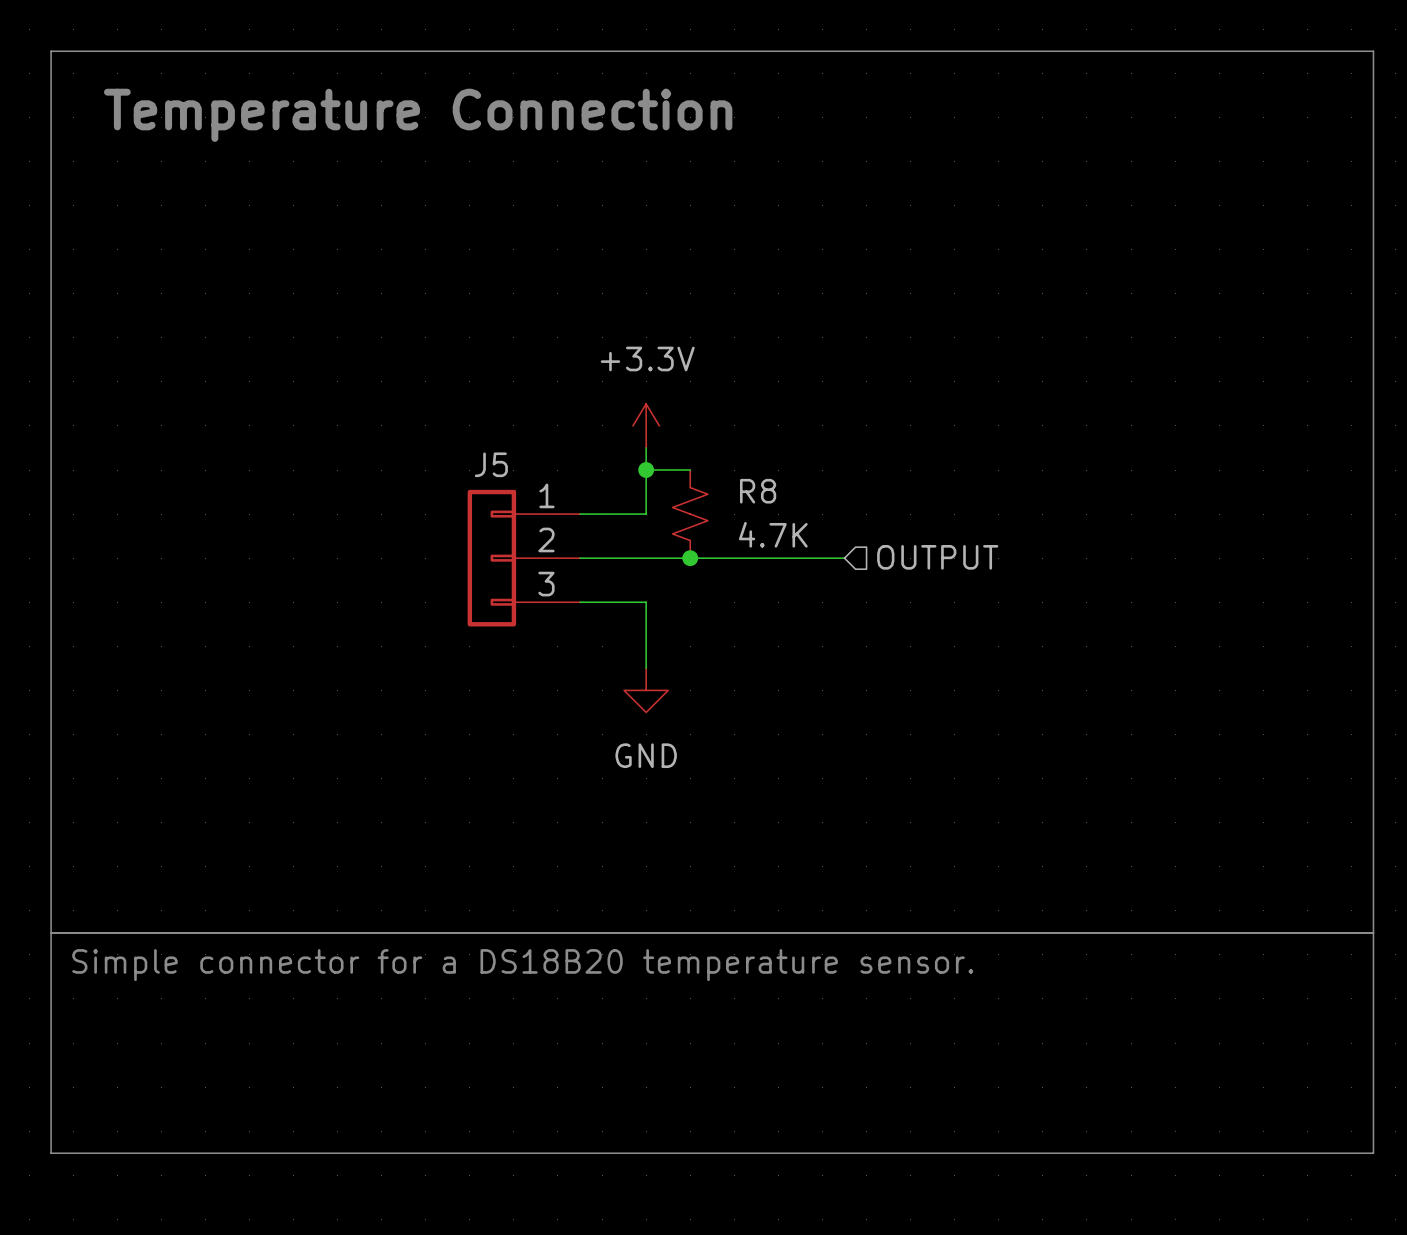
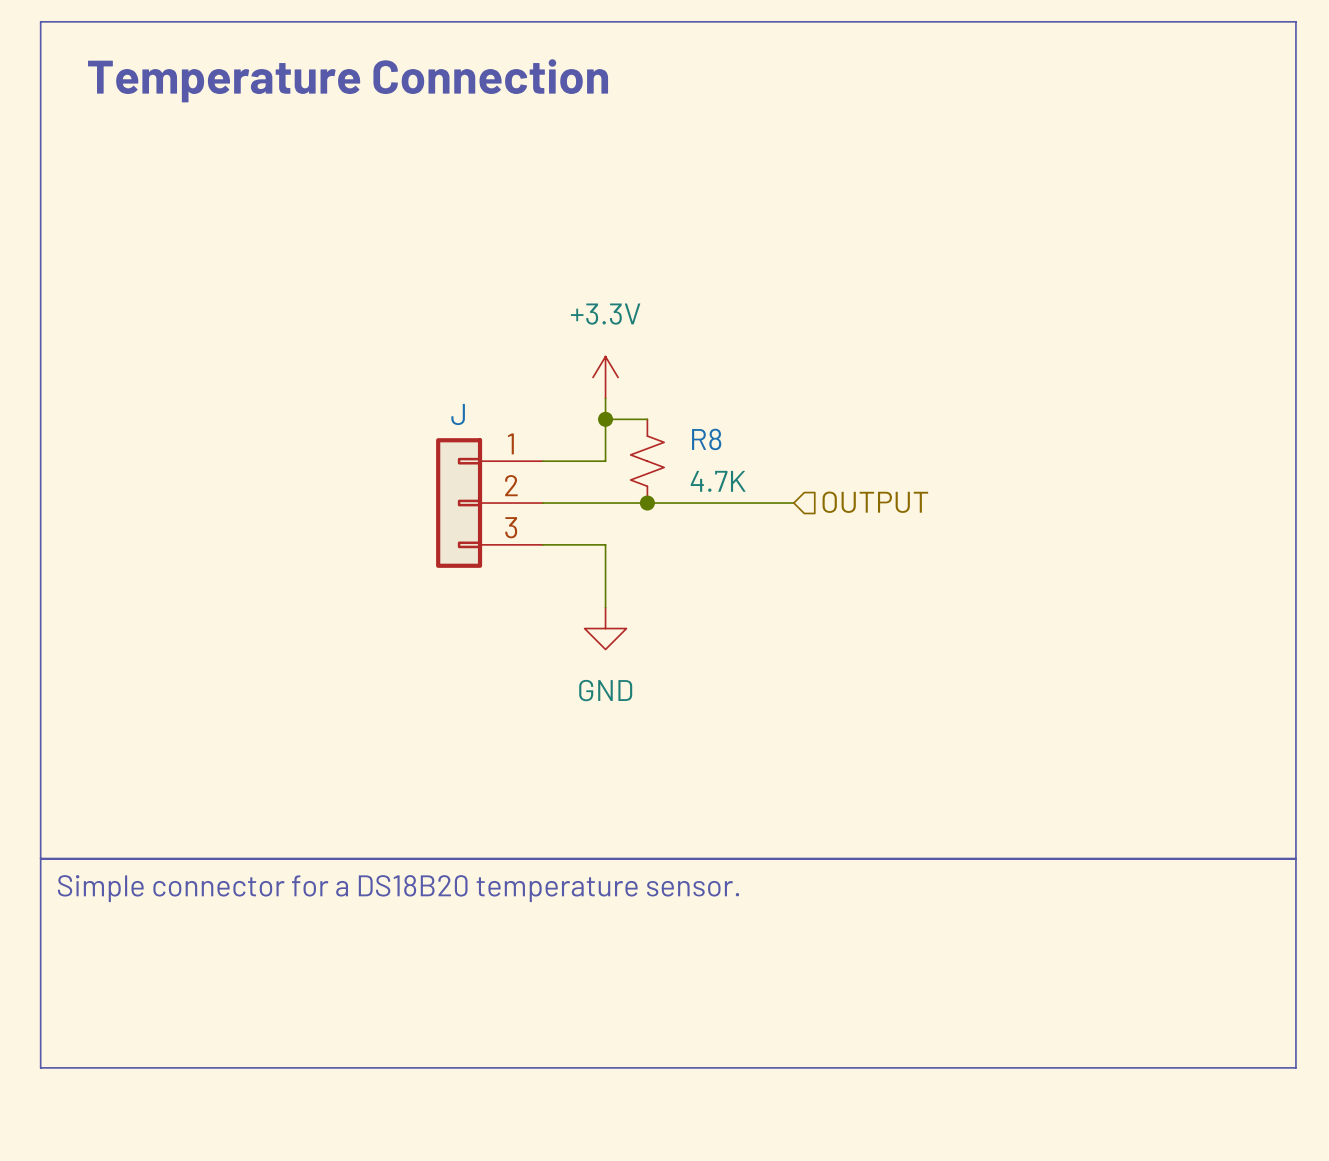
J5 name: J5 (491, 464) -> J (458, 414)

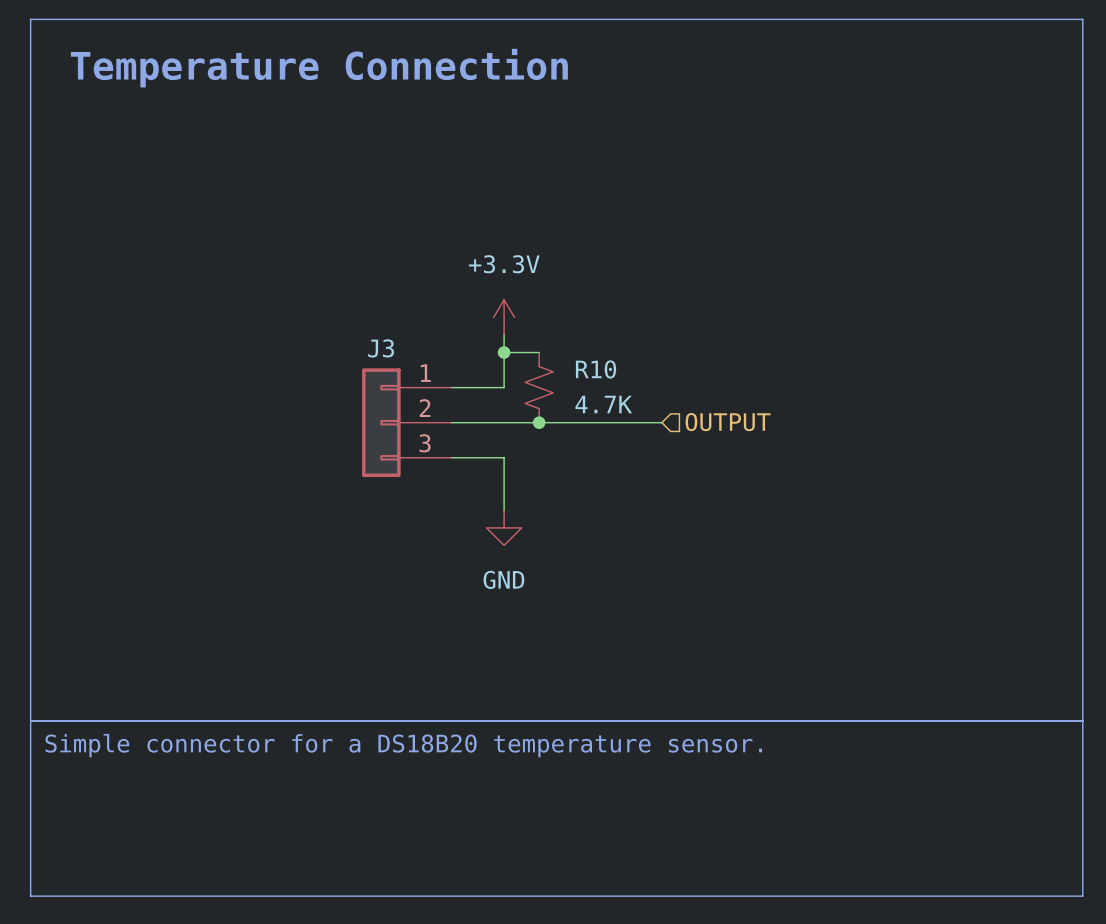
J name: J (458, 414) -> J3 (381, 348)
R8 name: R8 (706, 439) -> R10 (596, 369)

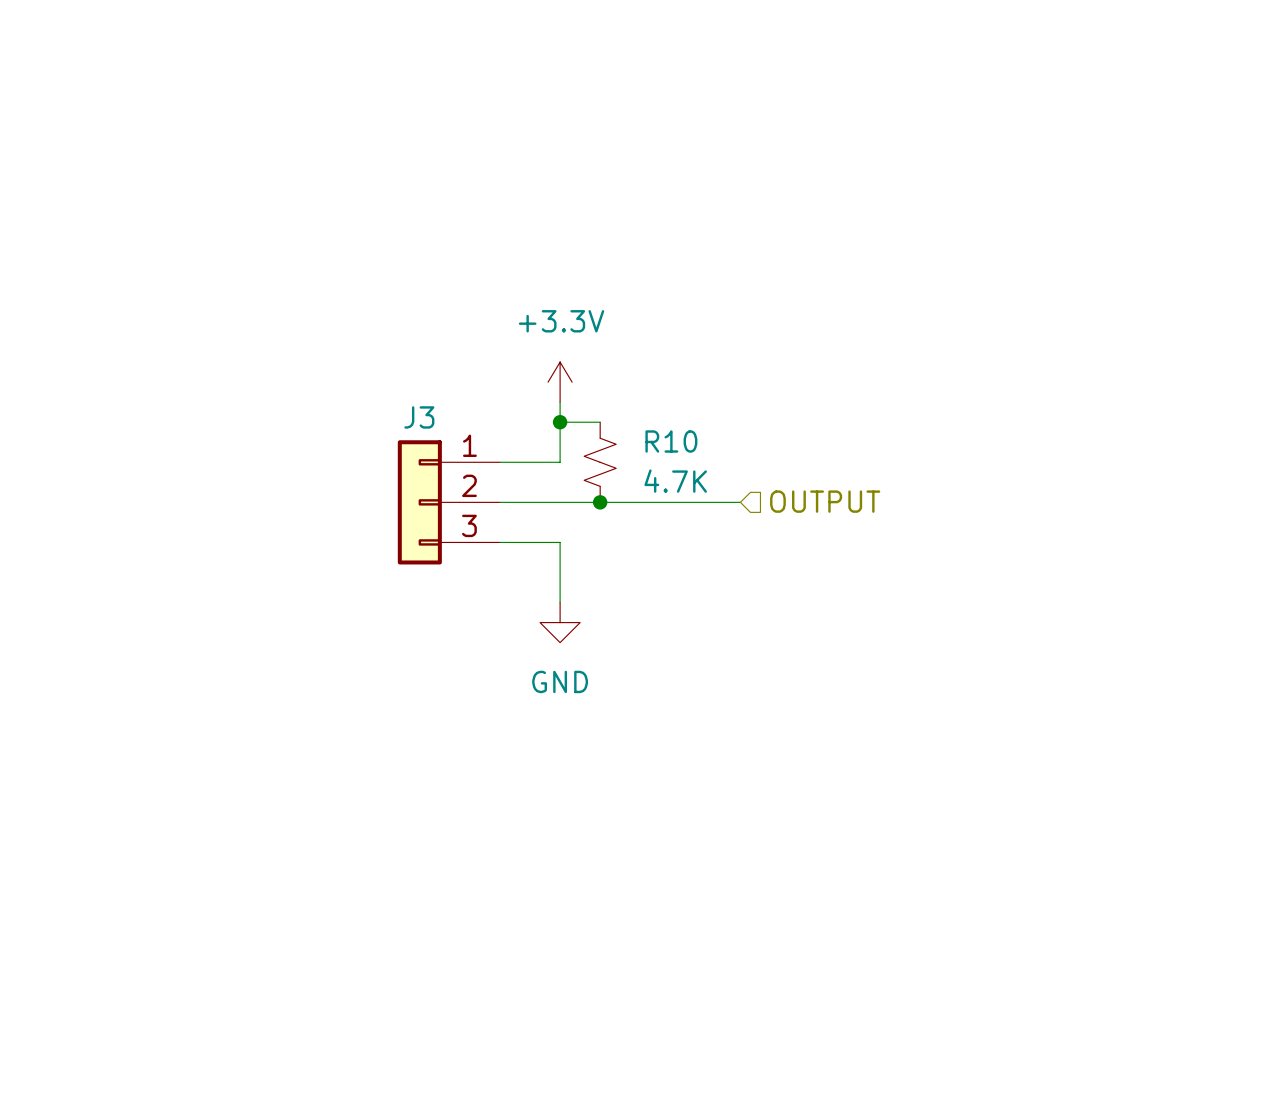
line: (30, 19) (1082, 19) (1082, 896) (30, 896) (30, 19) -> none
text: Temperature Connection (319, 68) -> none
line: (30, 720) (1082, 720) -> none
text: Simple connector for a DS18B20 temperature sensor. (403, 745) -> none

